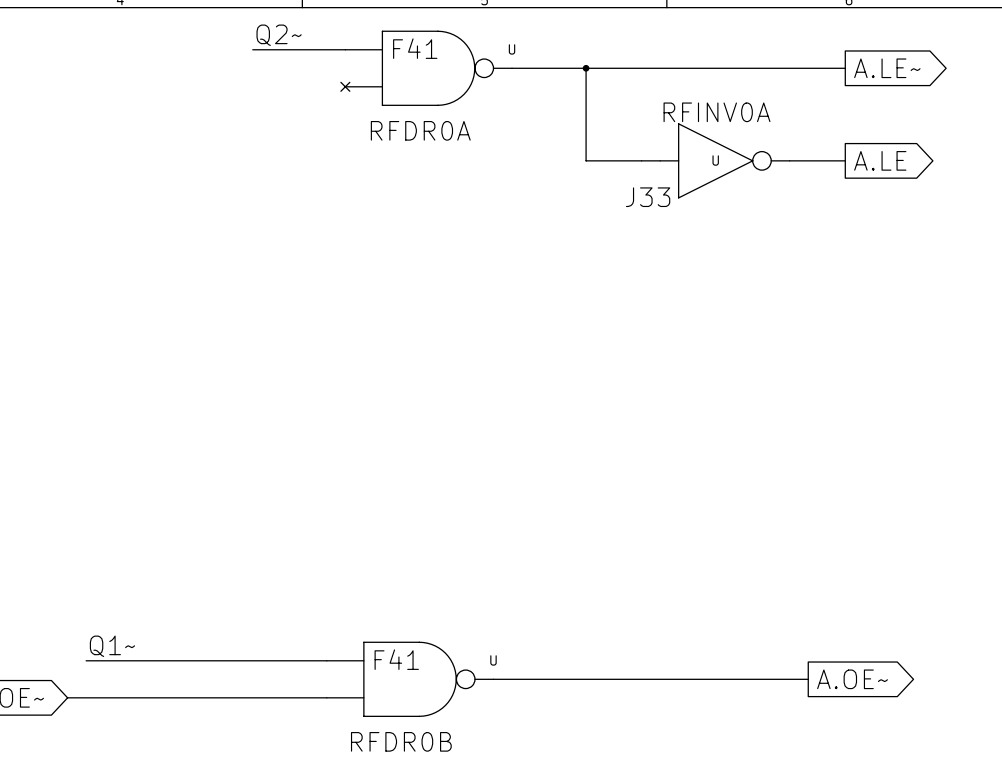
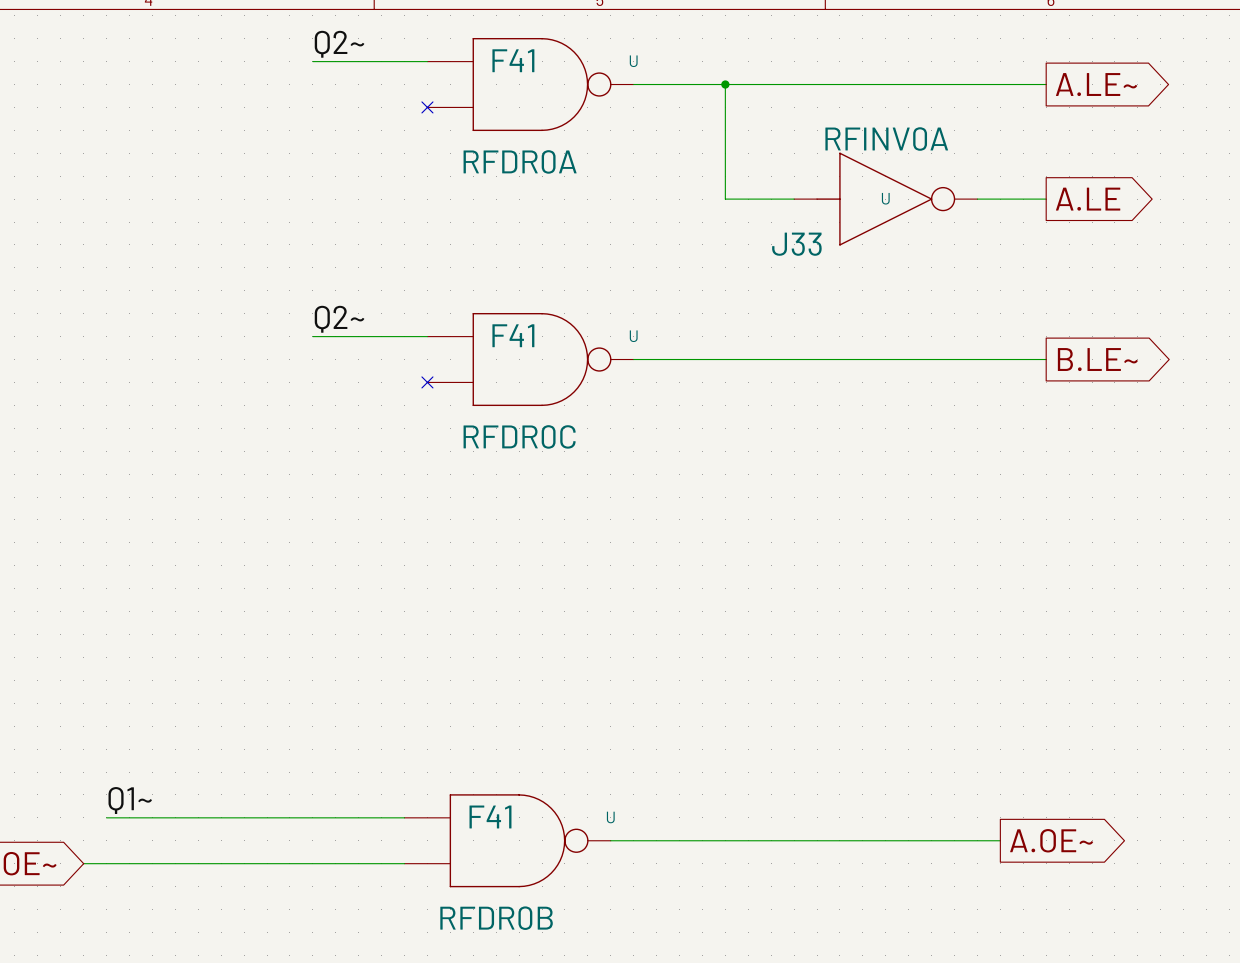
label: none -> Q2~ (339, 319)
wire: none -> (312, 336) (427, 336)
U: none -> (530, 359)
wire: none -> (633, 359) (1046, 359)
global label: none -> B.LE~ (1097, 359)
no-connect mark: none -> (427, 382)

